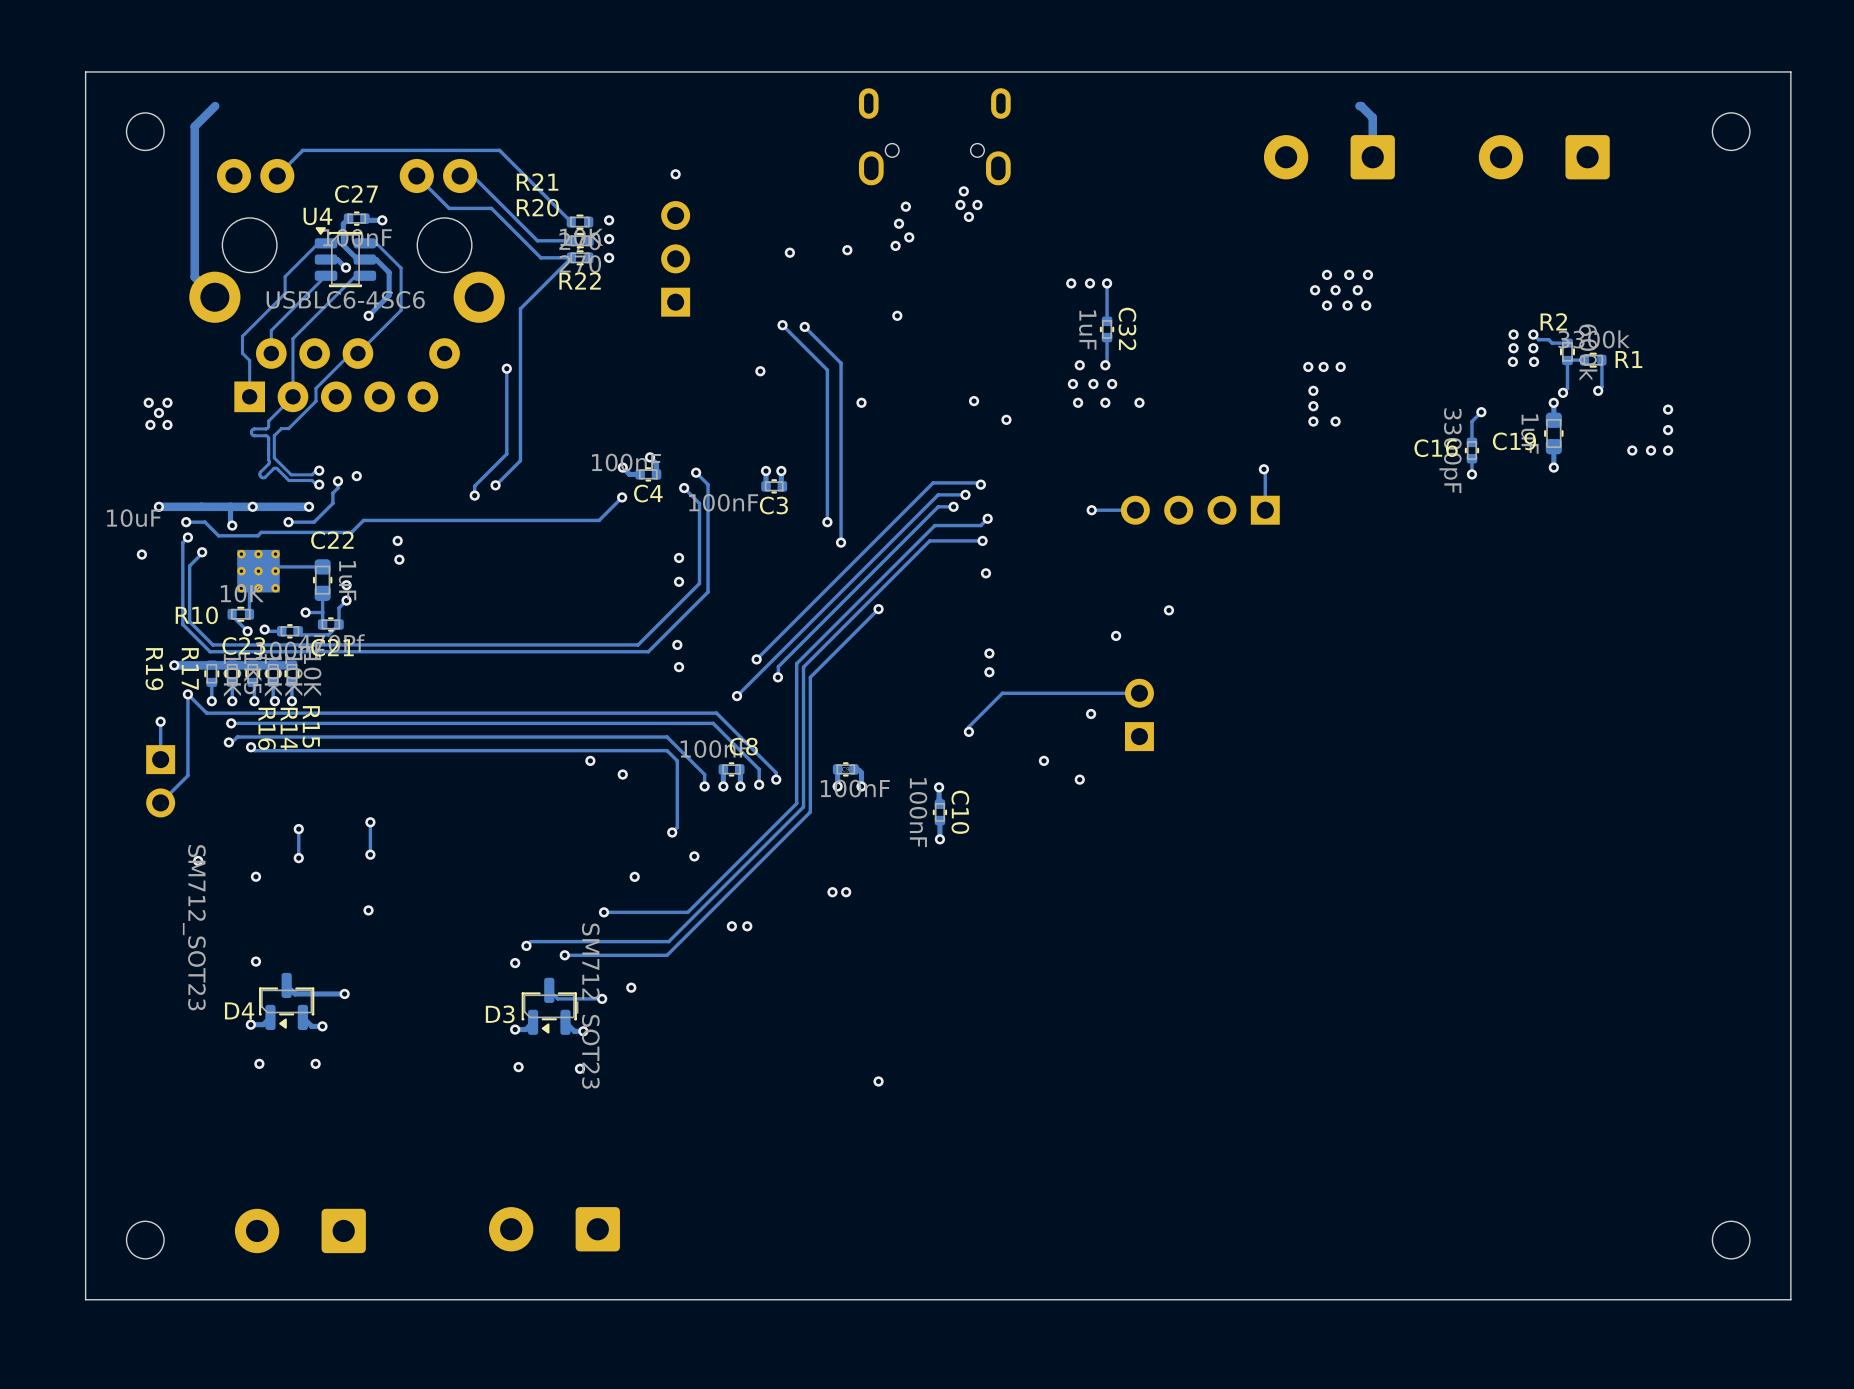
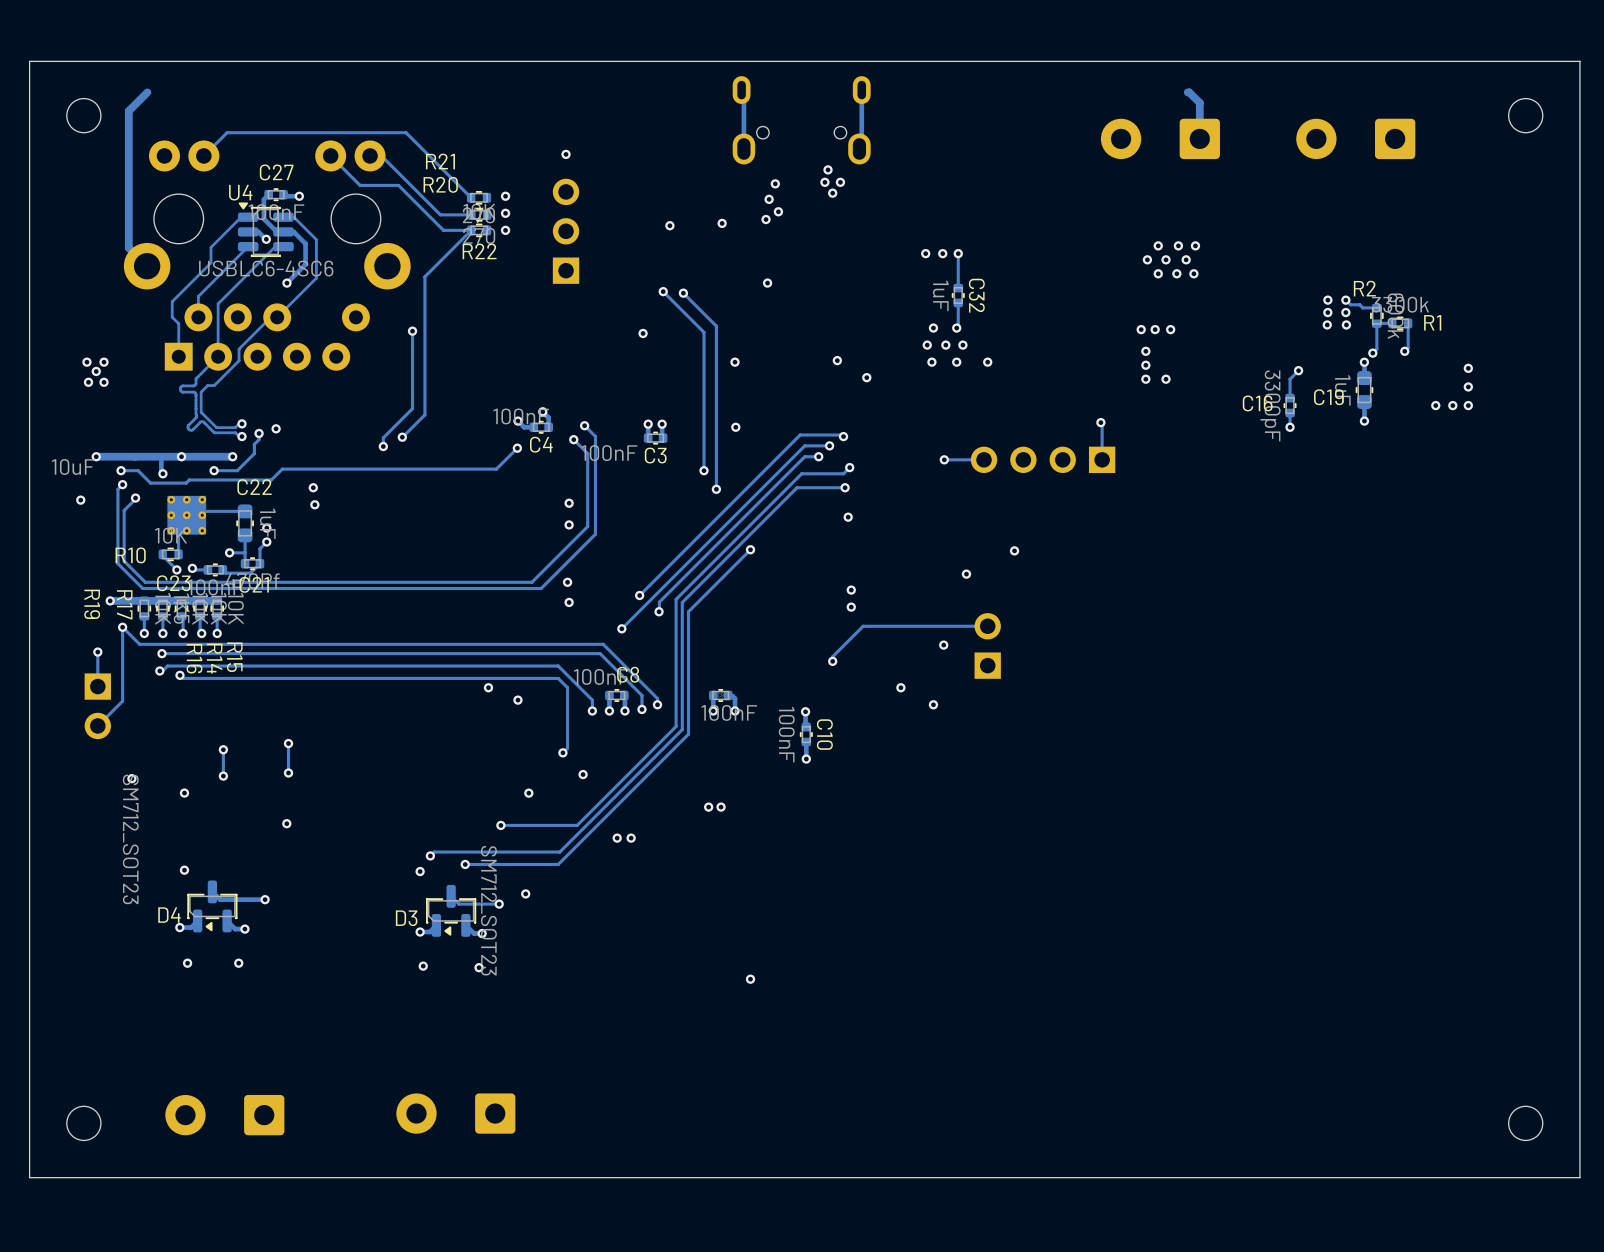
track: none -> (741, 90) (743, 92) (743, 148)
track: none -> (861, 90) (861, 146) (859, 148)
via: none -> (735, 427)

